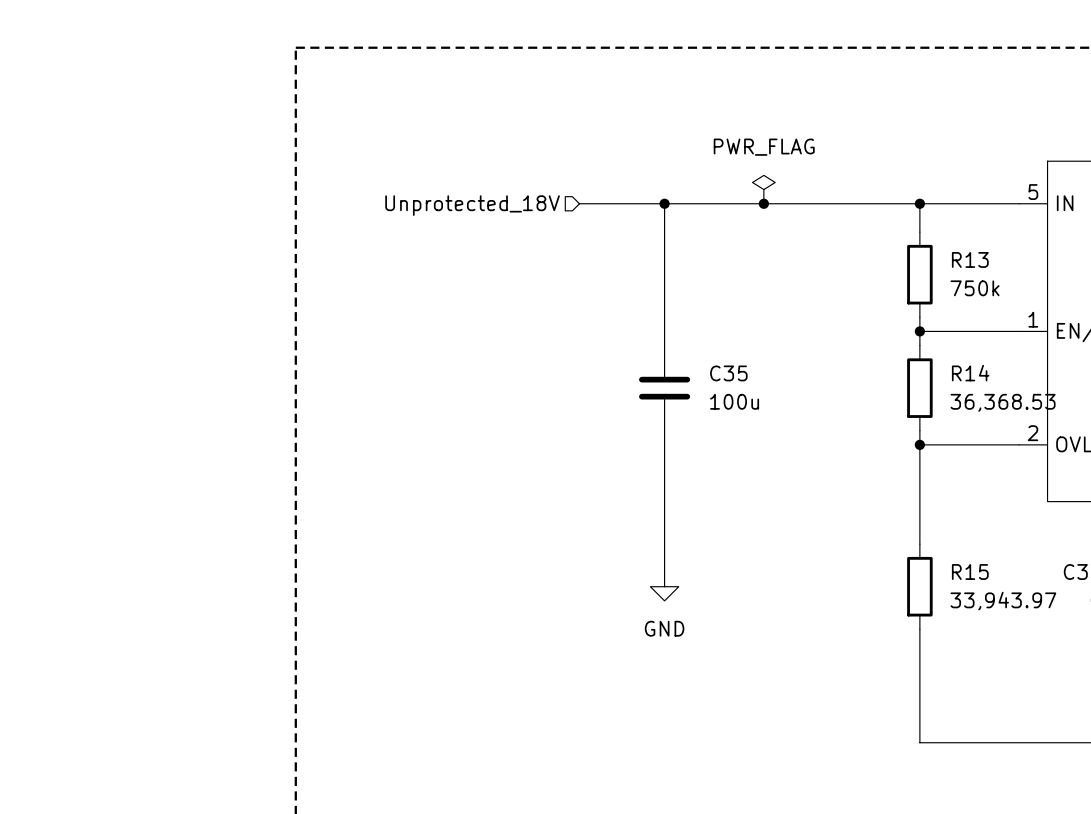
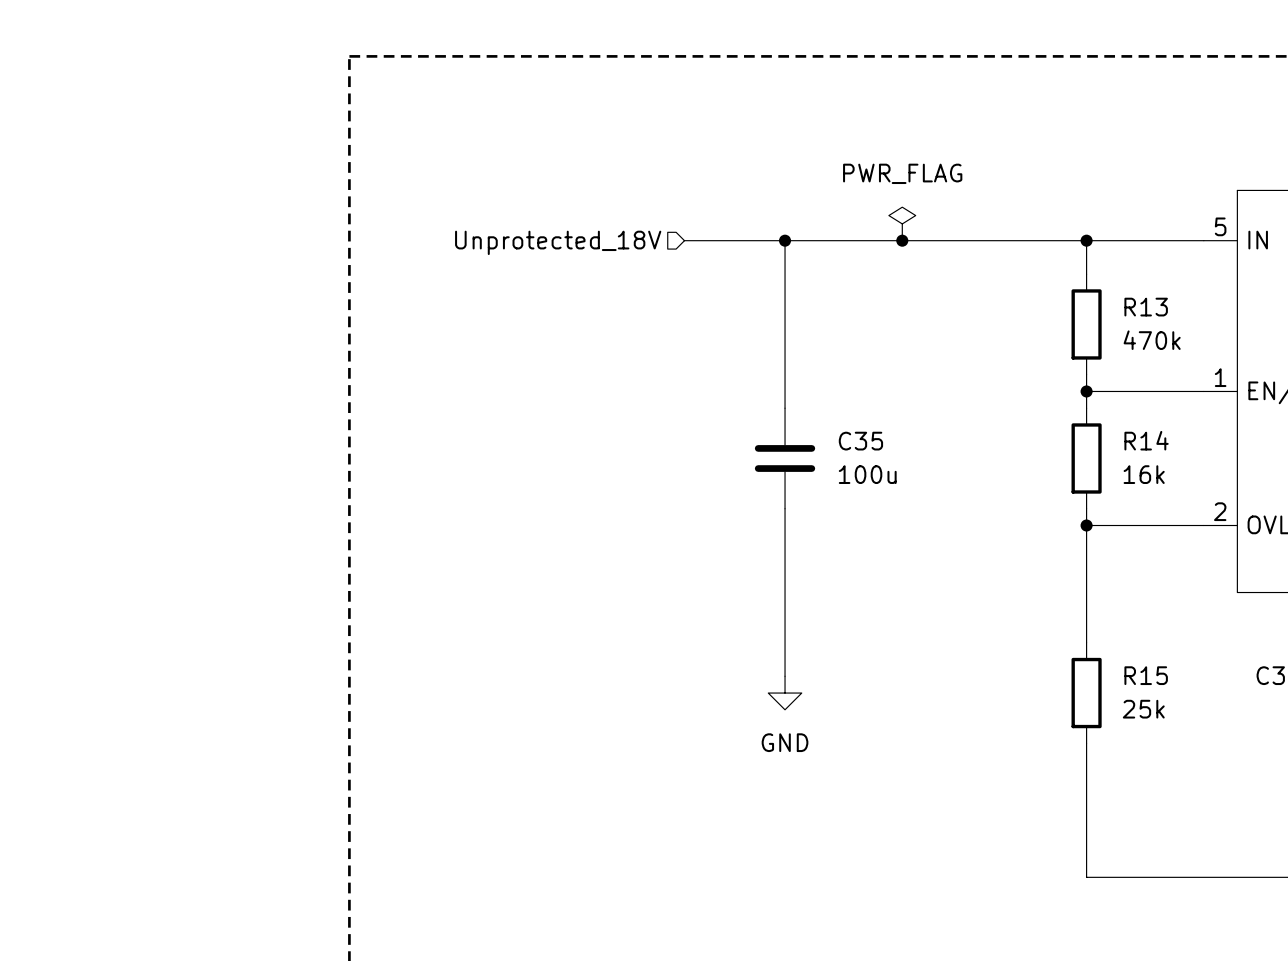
R13 value: 750k (975, 288) -> 470k (1152, 340)
R14 value: 36,368.53 (1003, 402) -> 16k (1144, 474)
R15 value: 33,943.97 (1003, 601) -> 25k (1143, 709)

